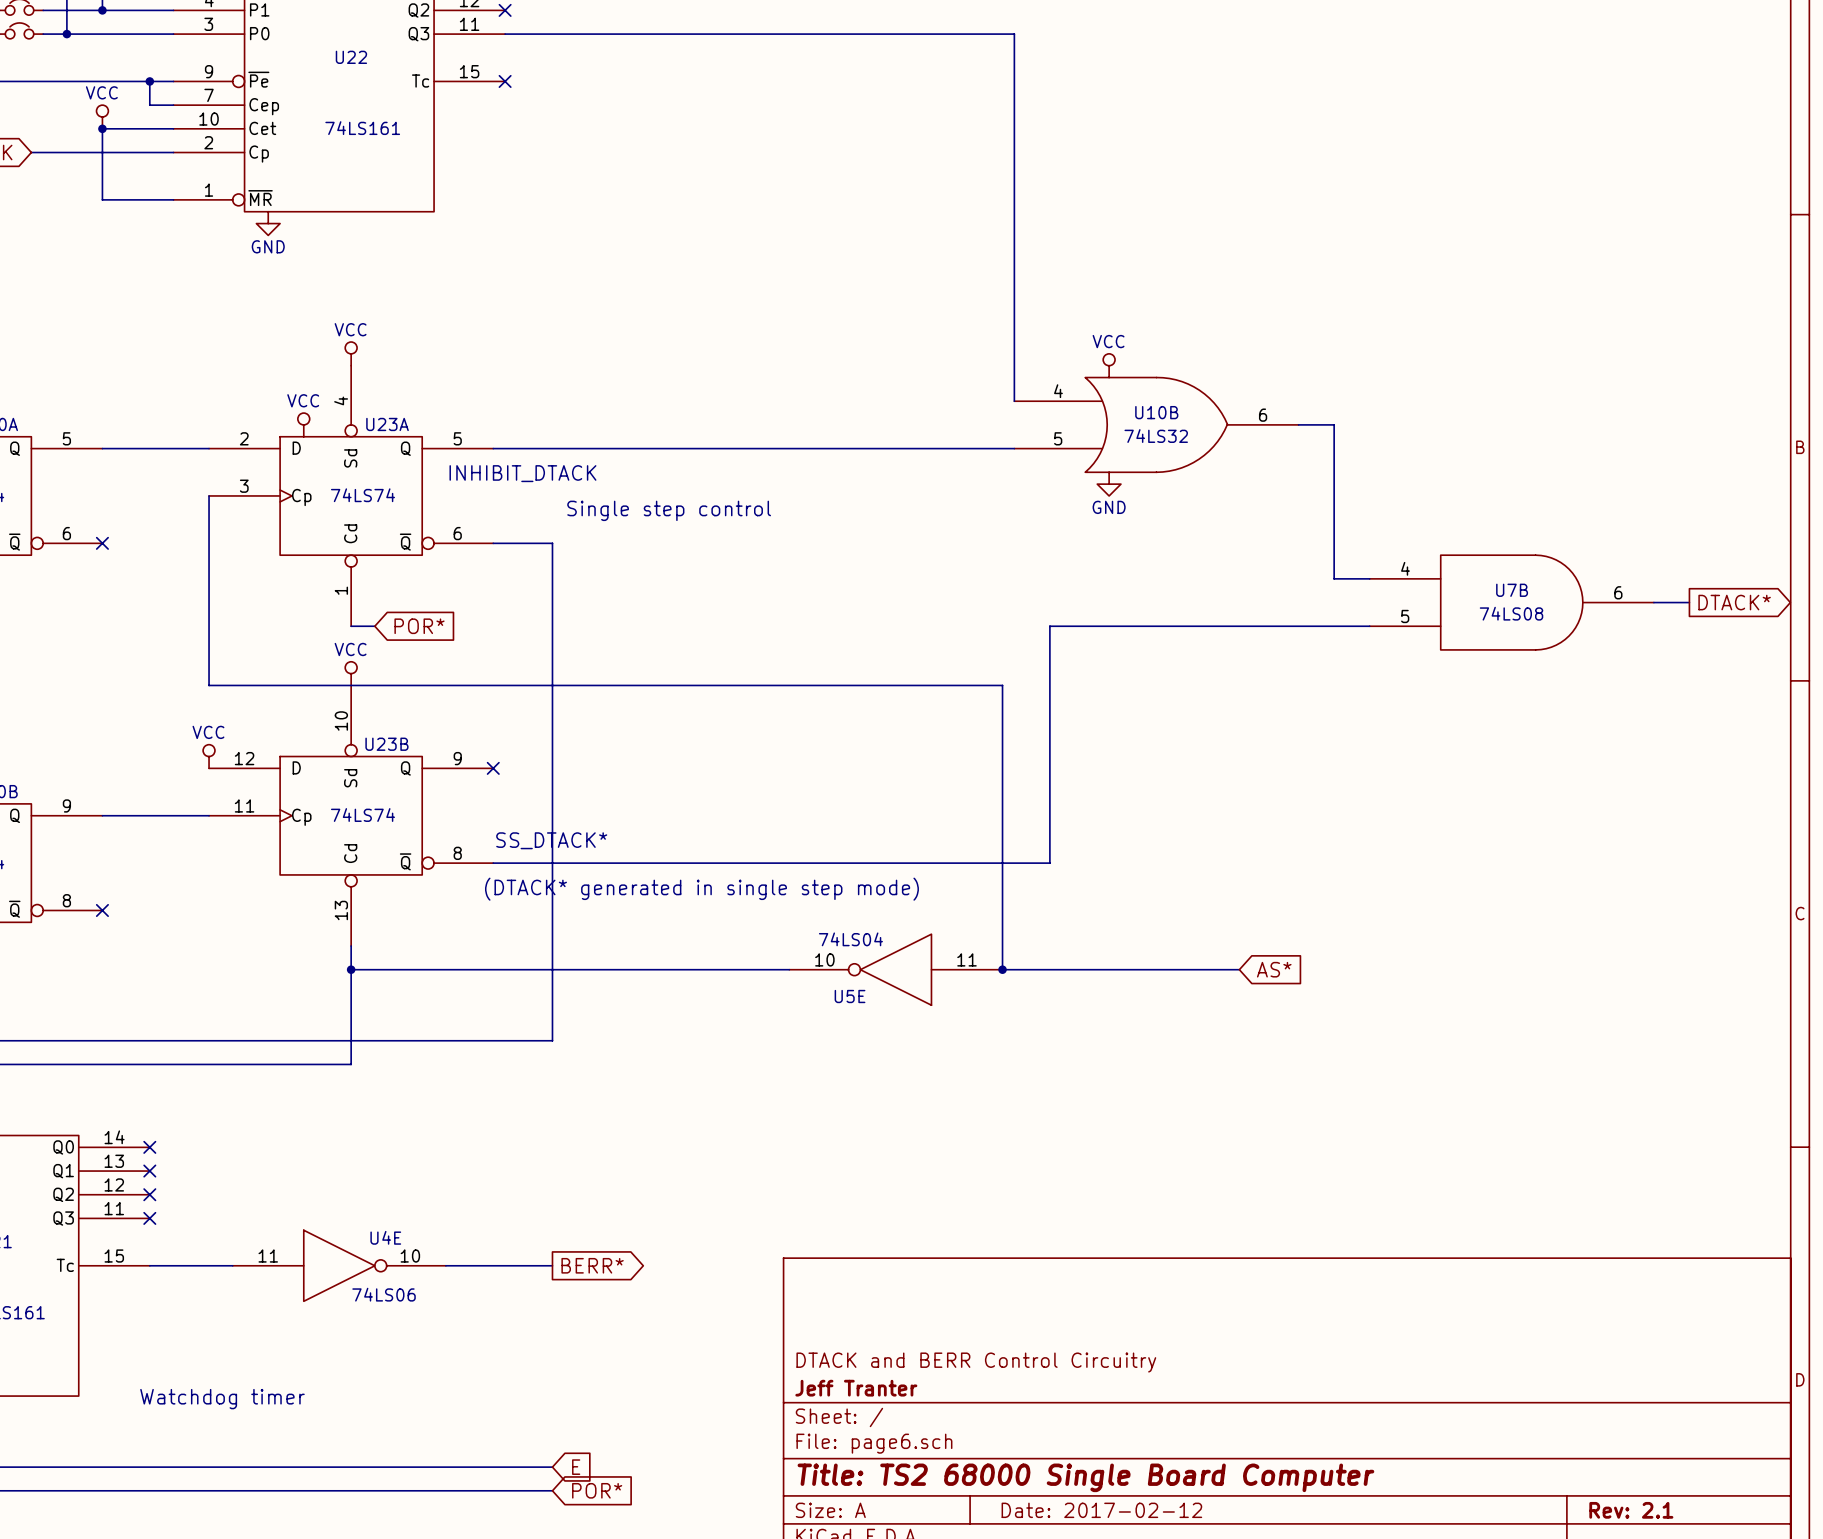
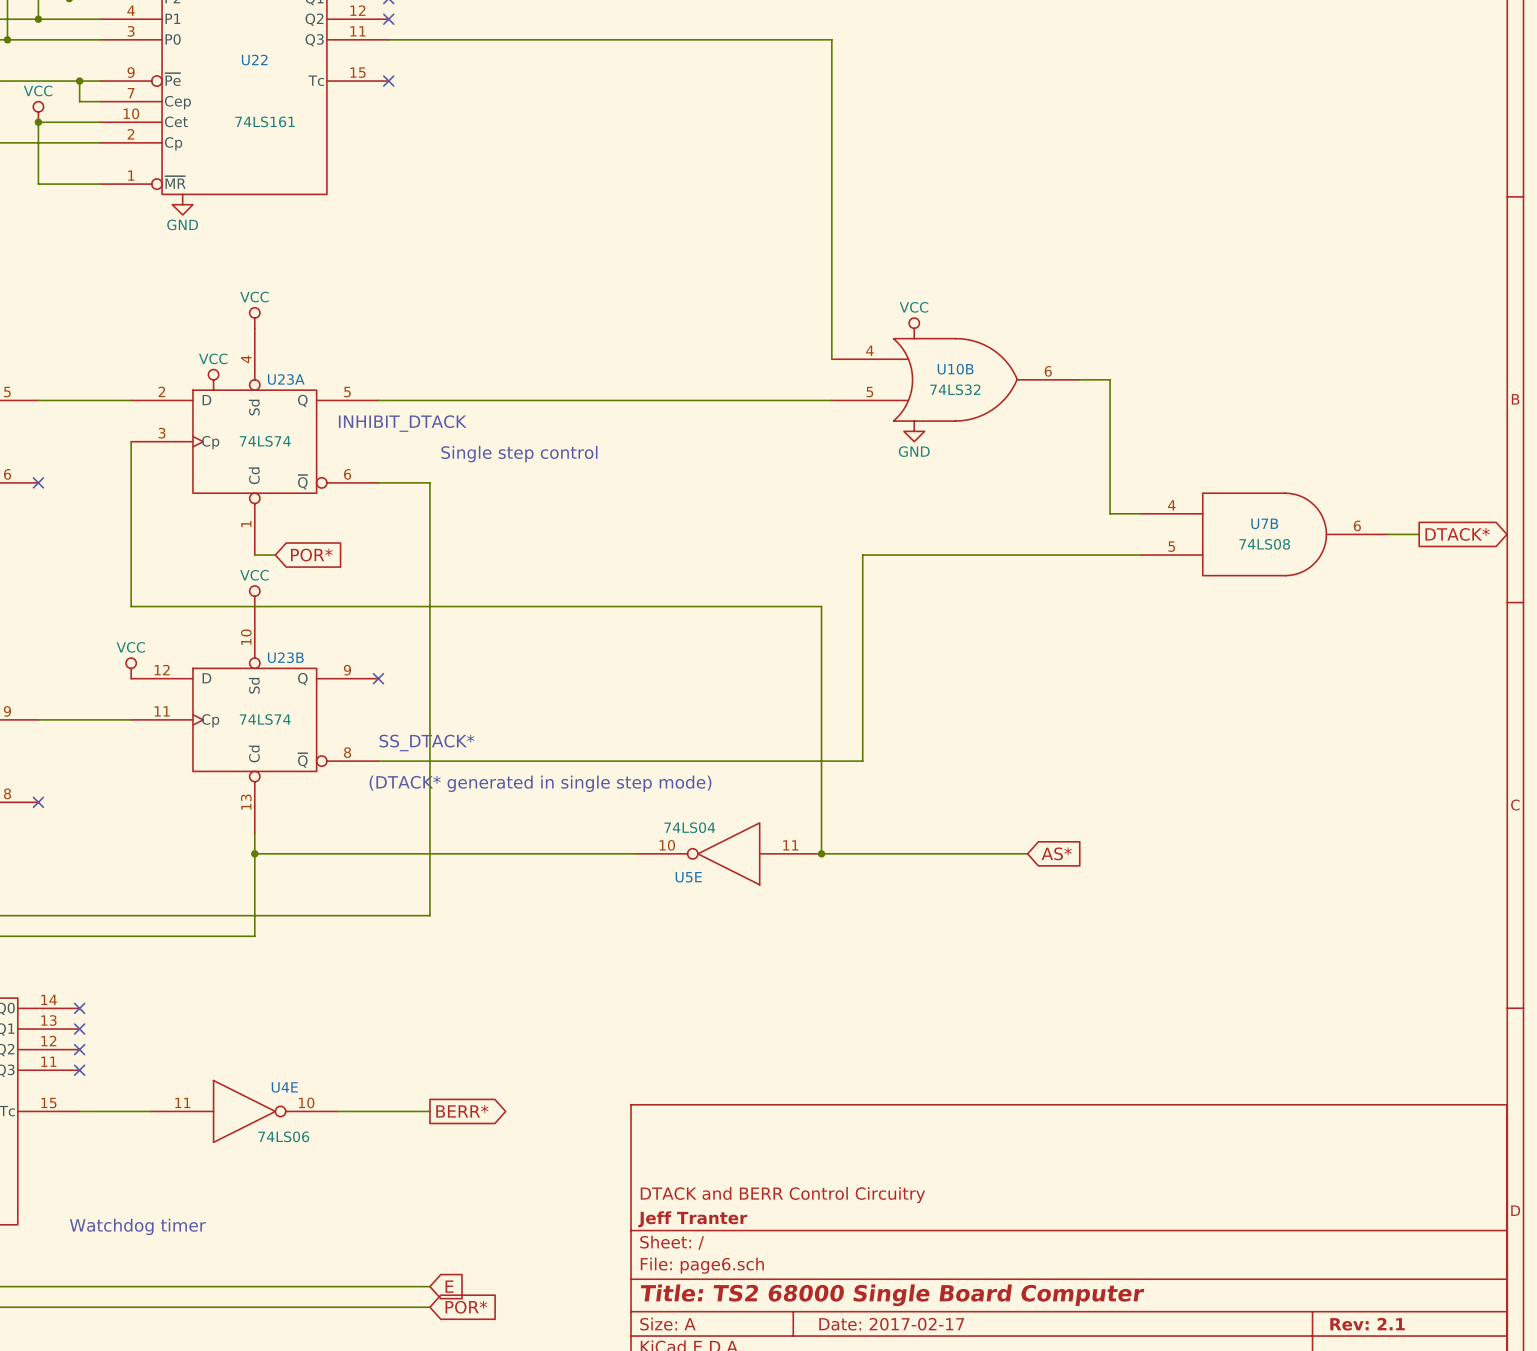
title block: Date: 2017-02-12 (1101, 1510) -> Date: 2017-02-17 (891, 1324)

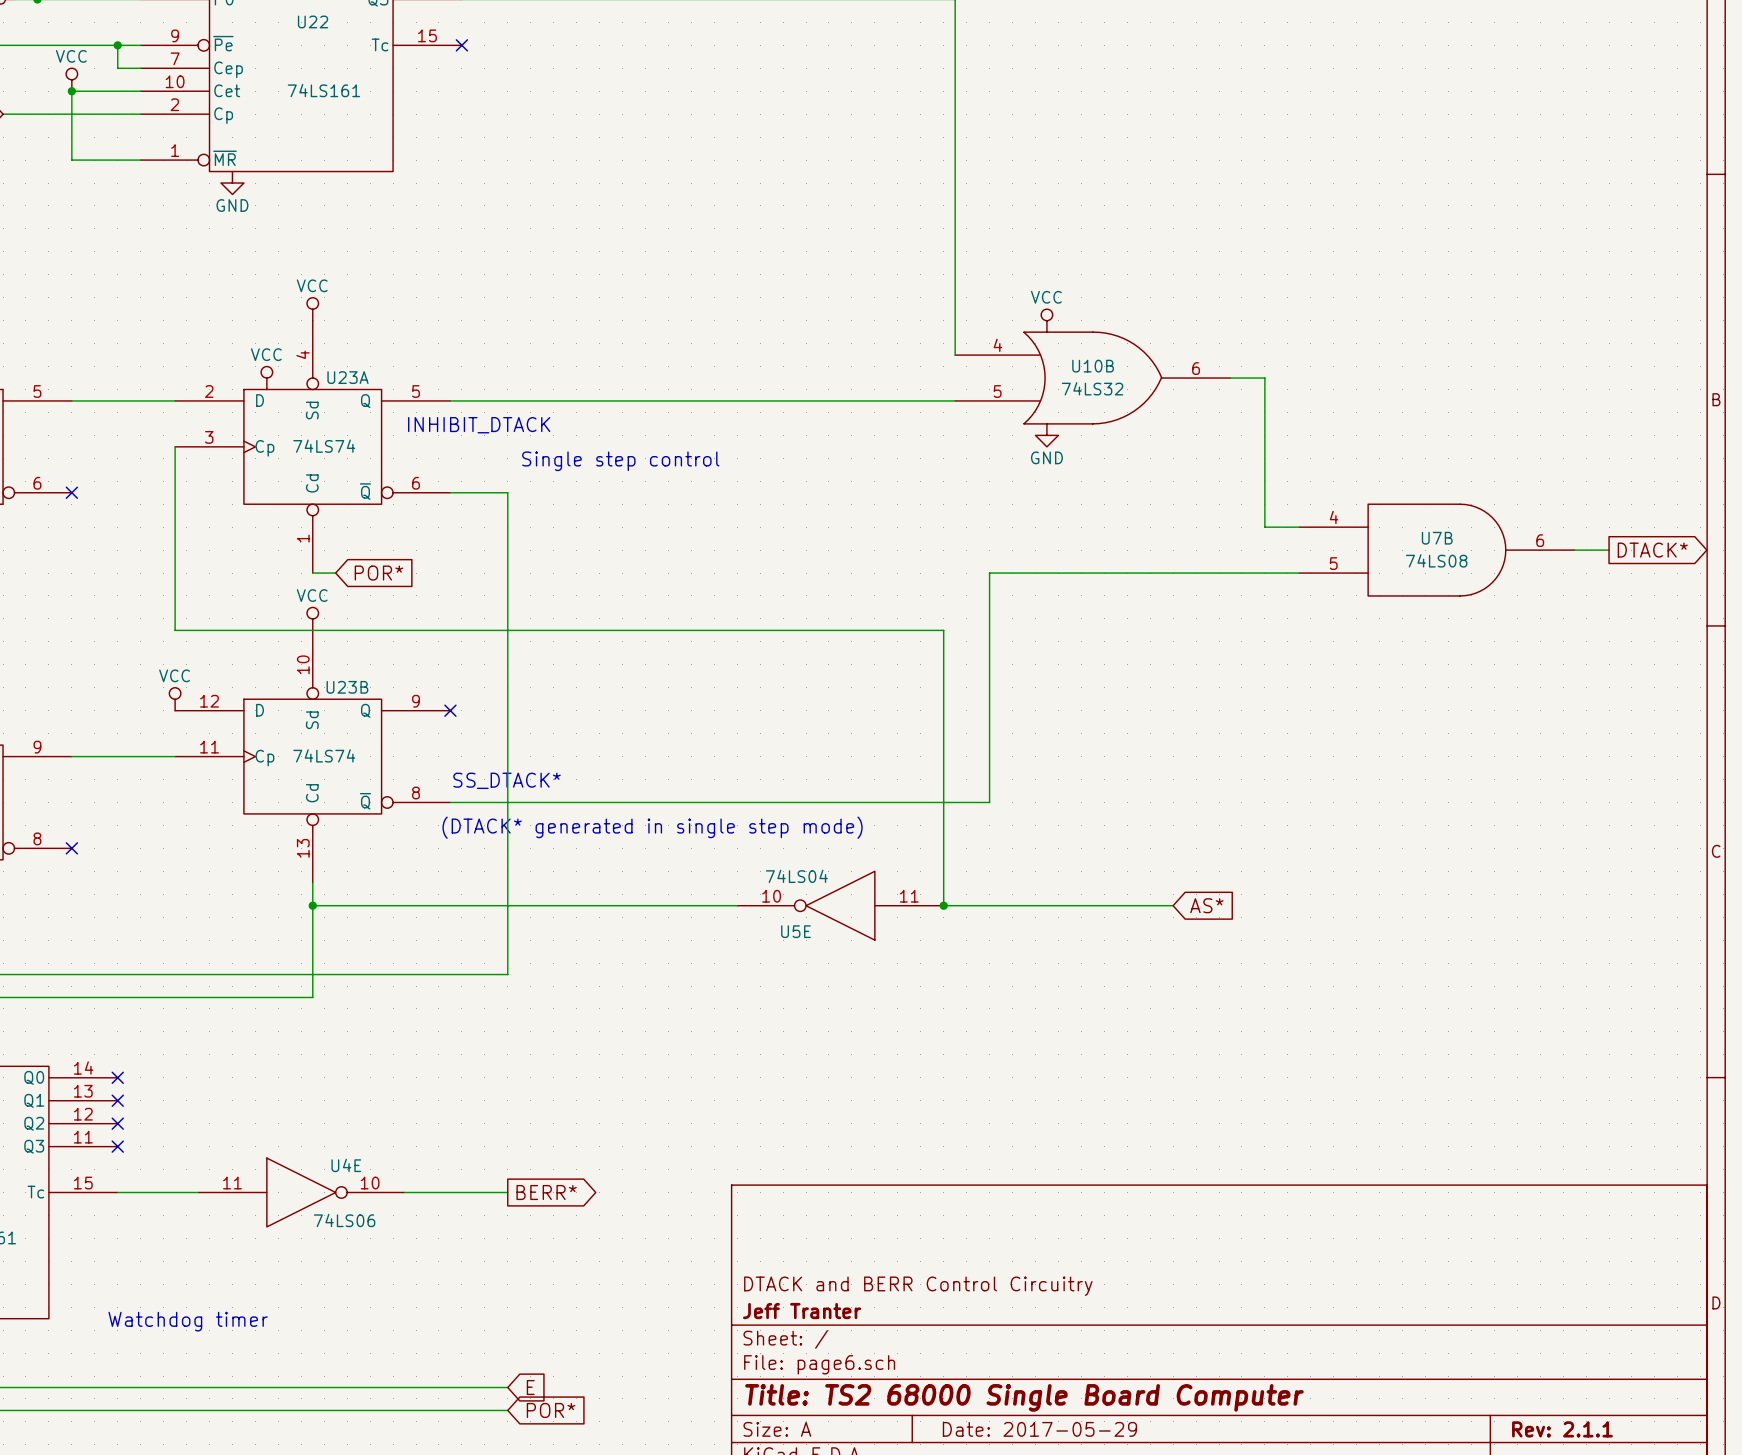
title block: Date: 2017-02-17 (891, 1324) -> Date: 2017-05-29 (1039, 1429)
title block: Rev: 2.1 (1367, 1324) -> Rev: 2.1.1 (1562, 1429)

